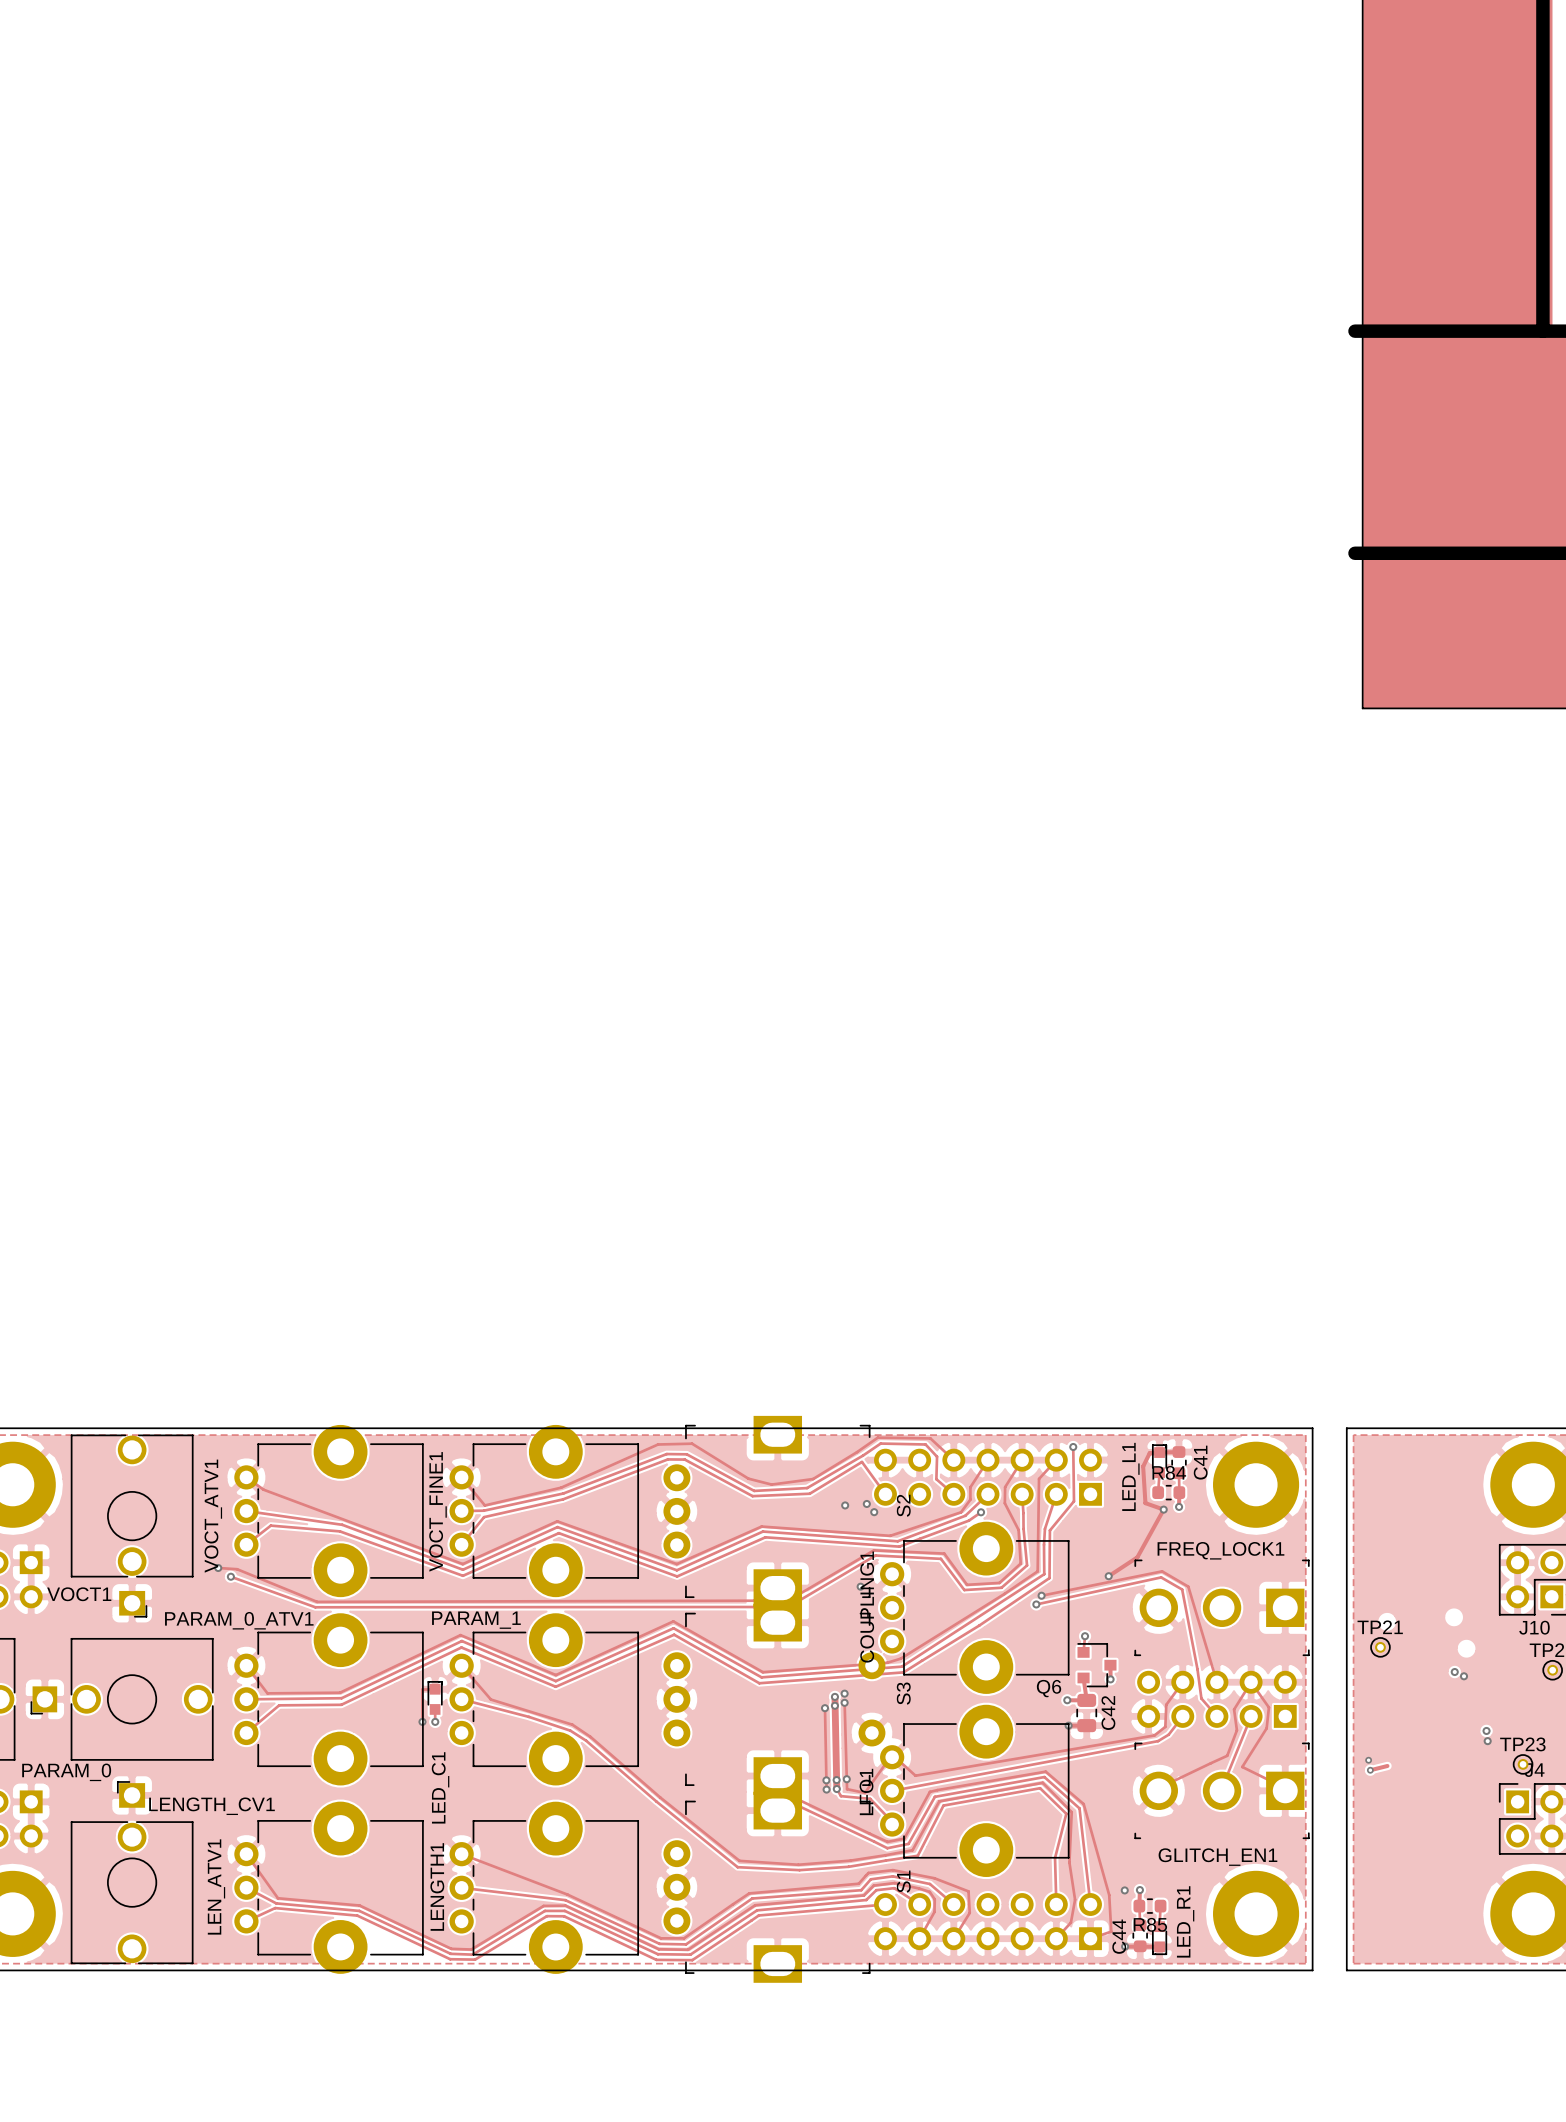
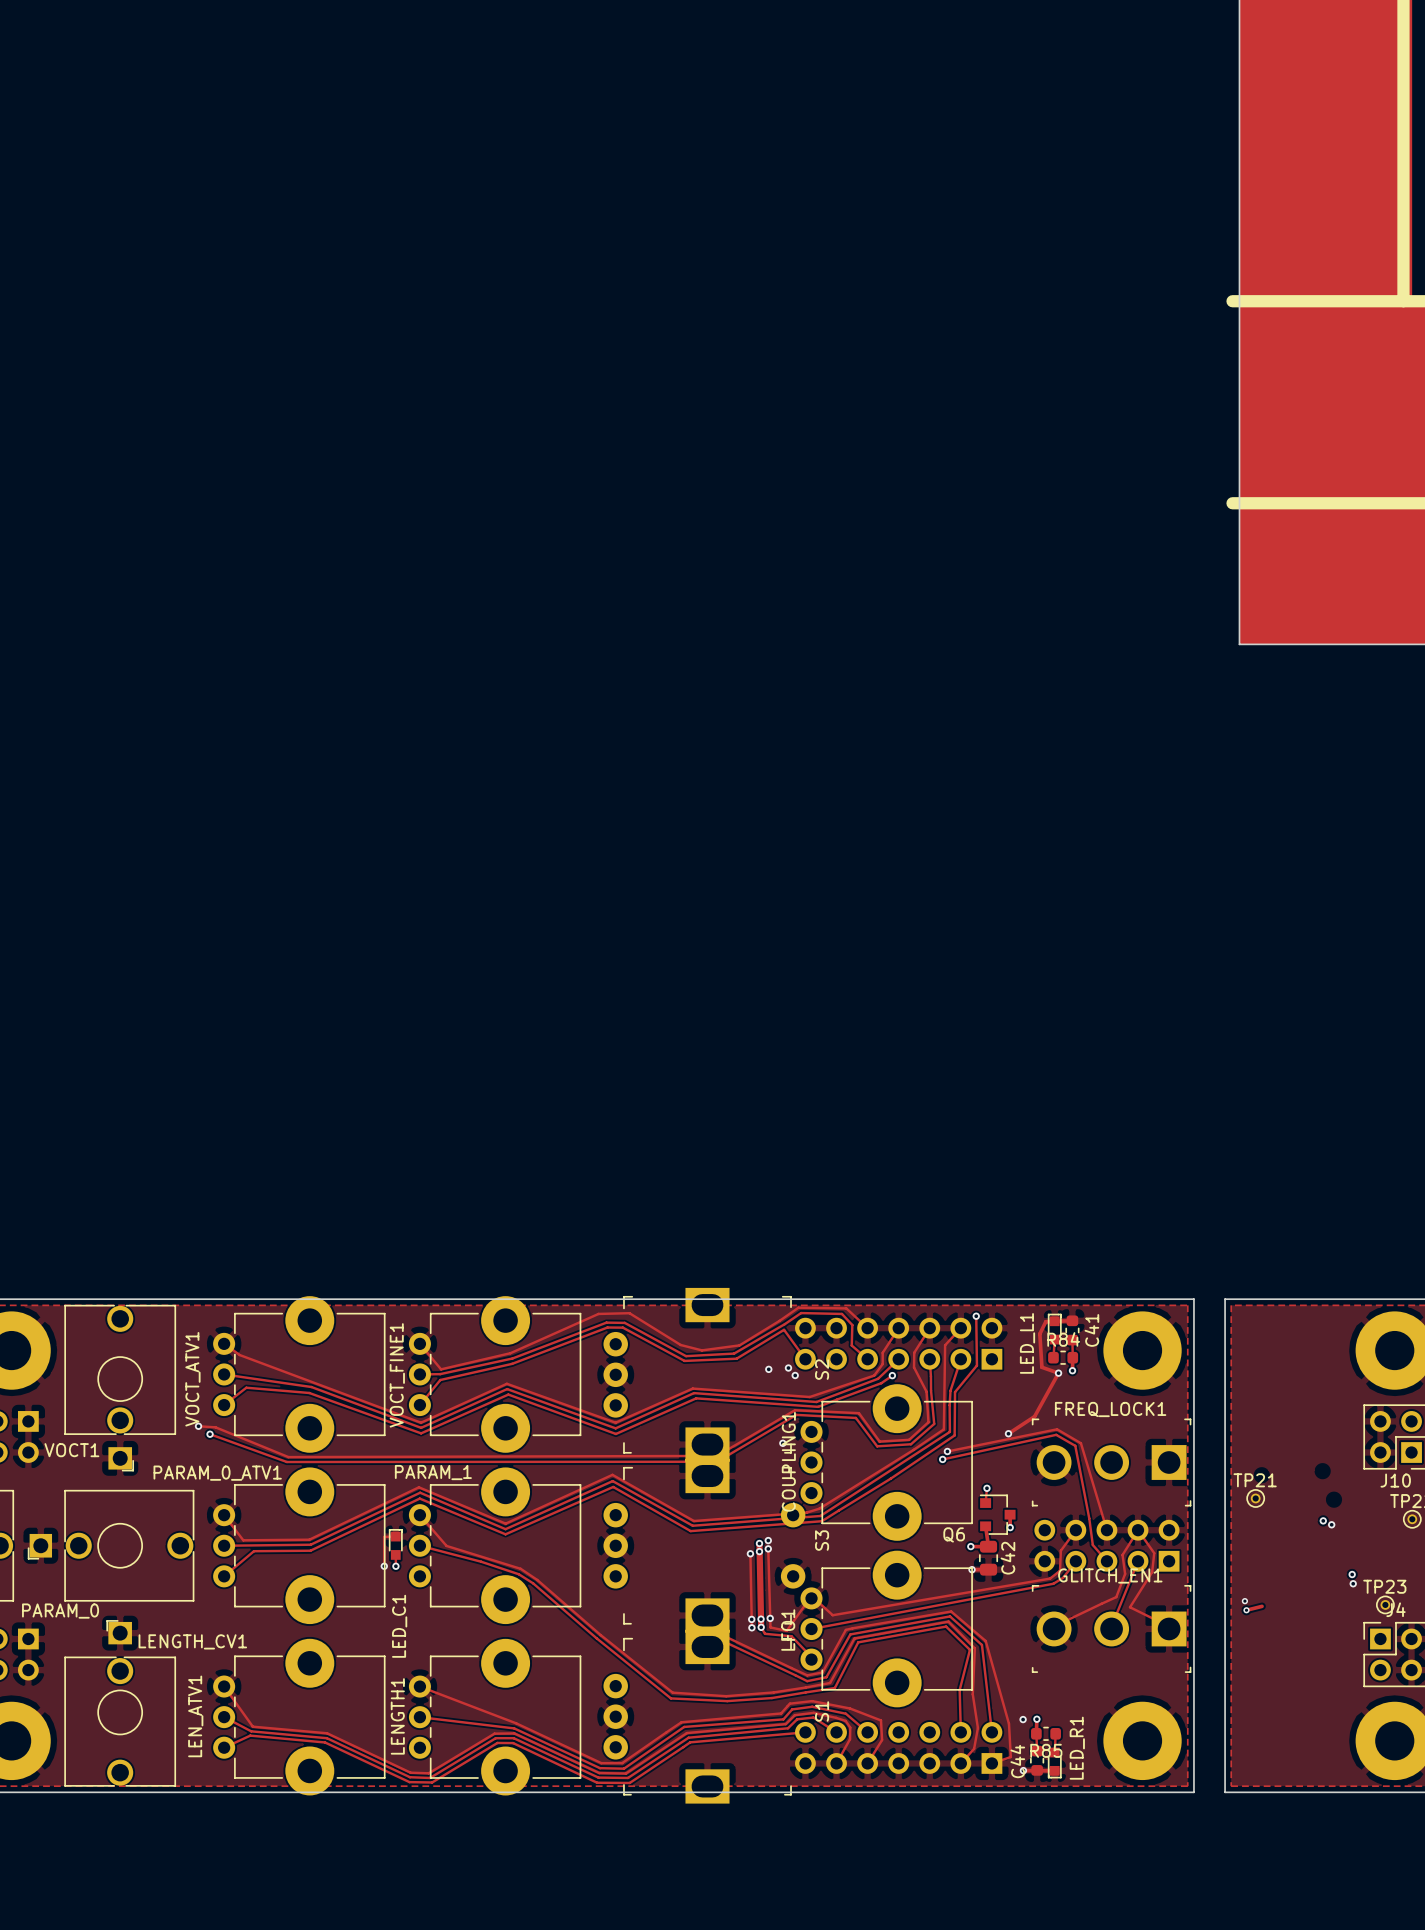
GLITCH_EN1 name position: GLITCH_EN1 (1217, 1857) -> GLITCH_EN1 (1110, 1575)

